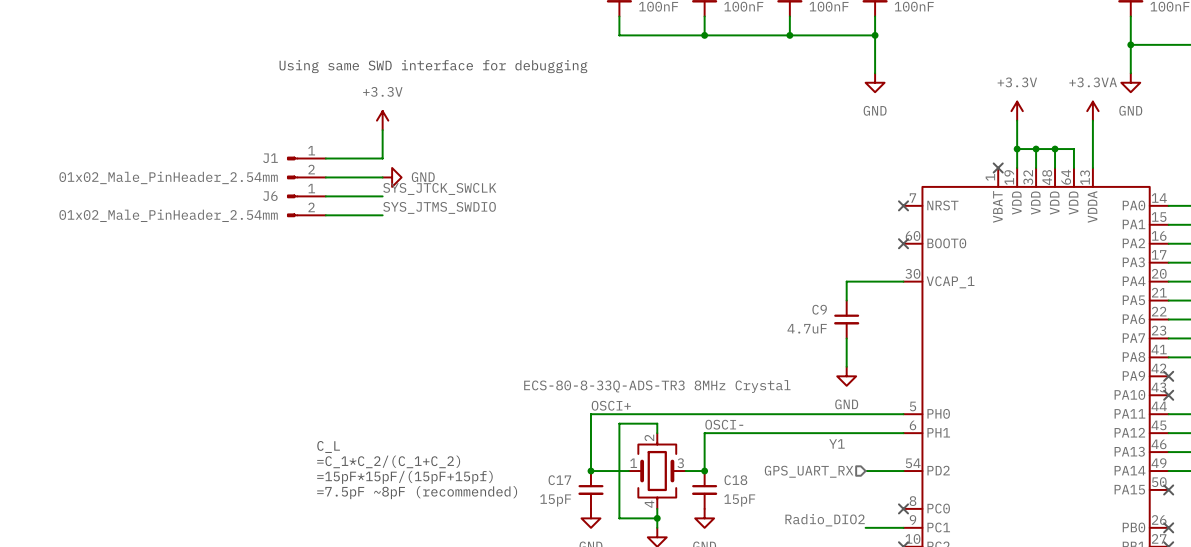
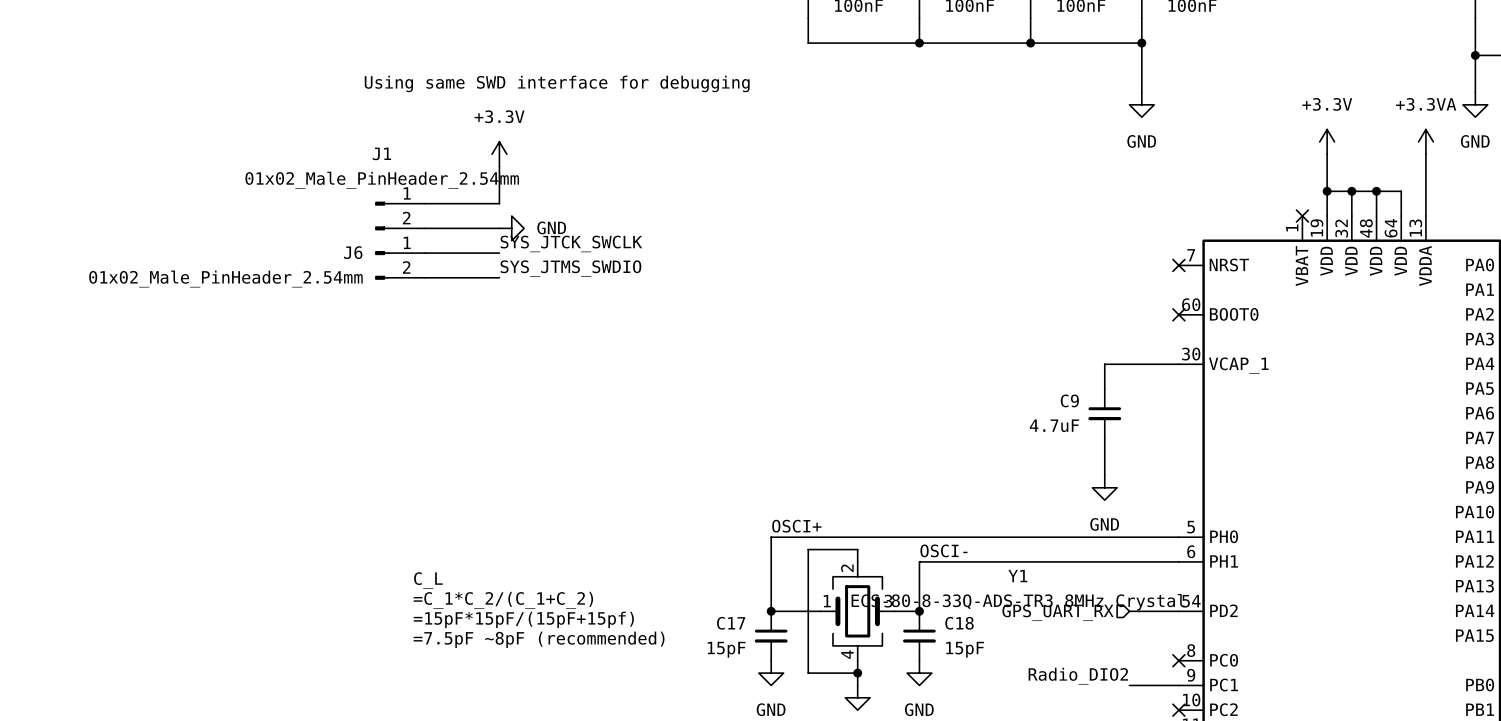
J1 name position: J1 (270, 158) -> J1 (381, 153)
J1 value position: 01x02_Male_PinHeader_2.54mm (168, 177) -> 01x02_Male_PinHeader_2.54mm (382, 180)
Y1 value position: ECS-80-8-33Q-ADS-TR3 8MHz Crystal (657, 386) -> ECS-80-8-33Q-ADS-TR3 8MHz Crystal (1018, 602)
Y1 name position: Y1 (837, 443) -> Y1 (1017, 576)

